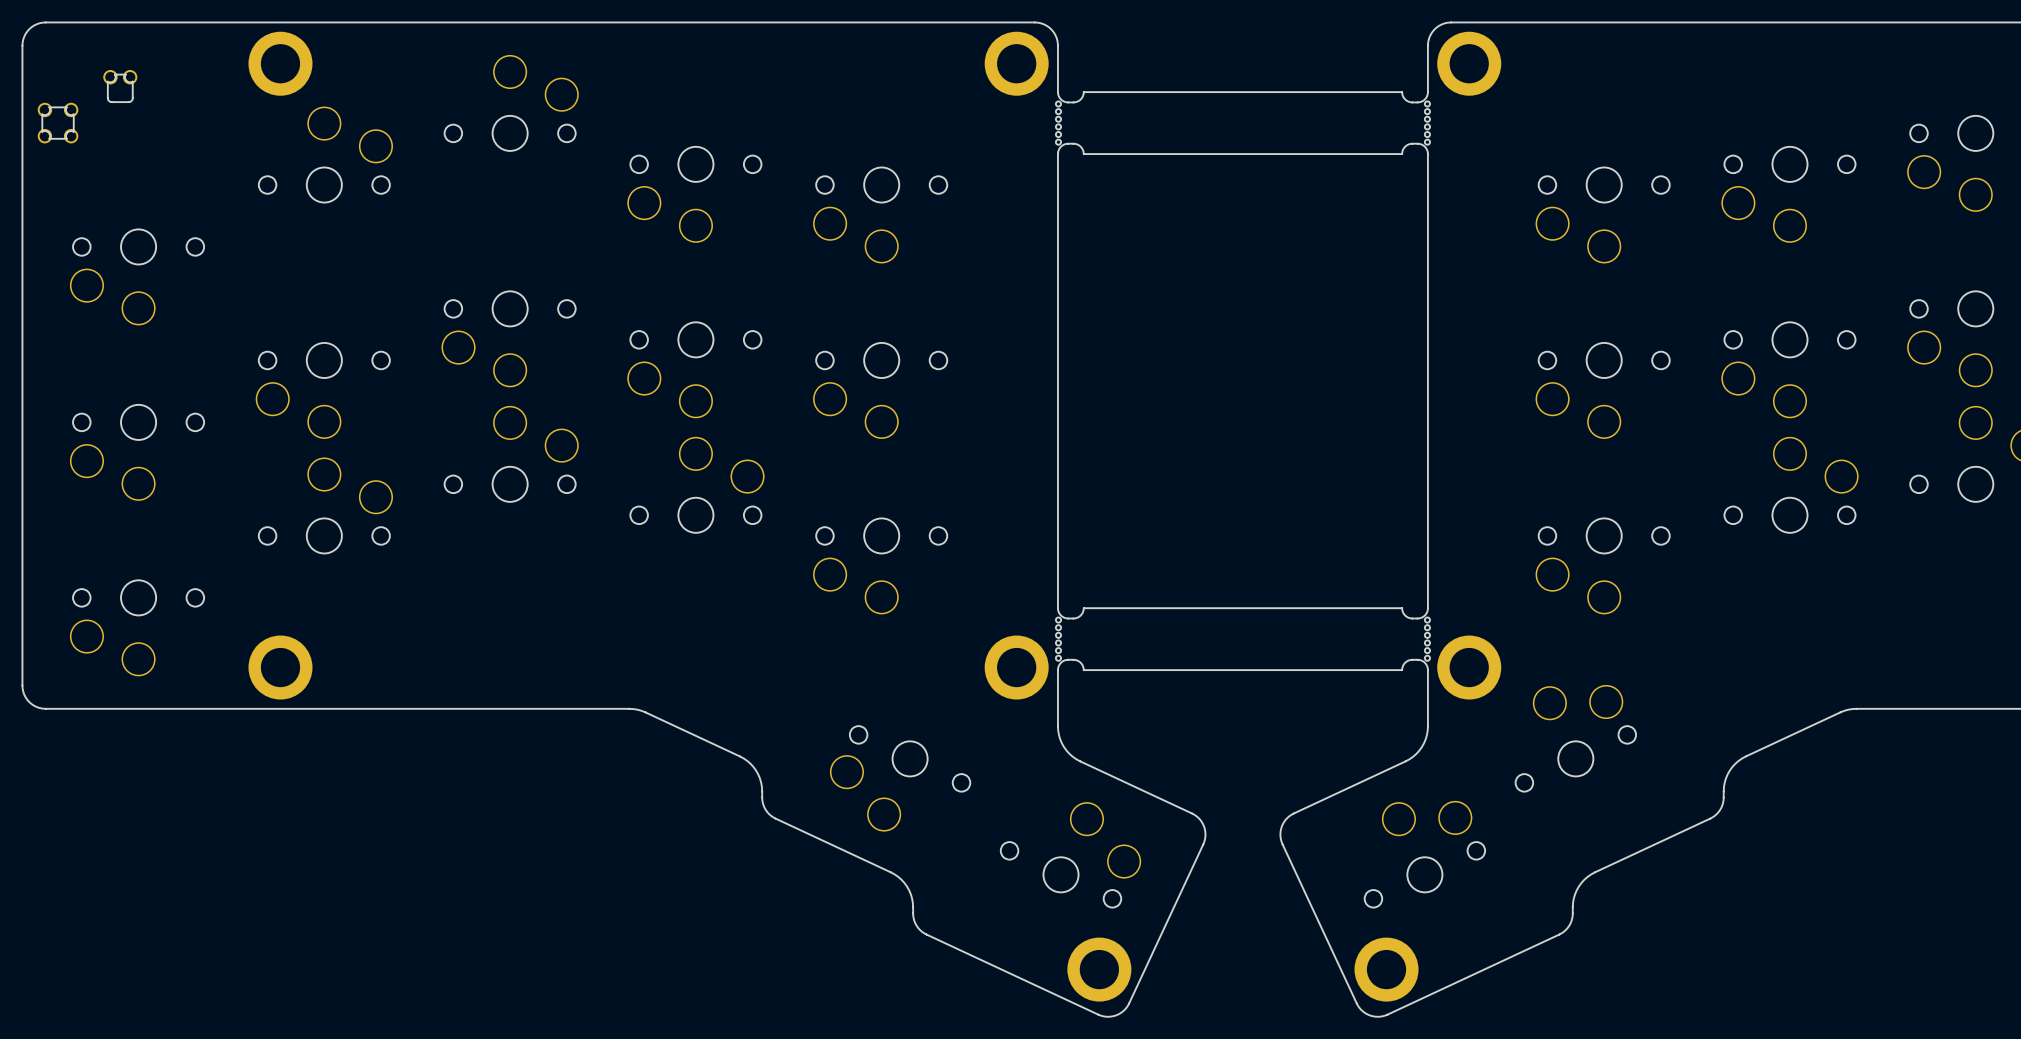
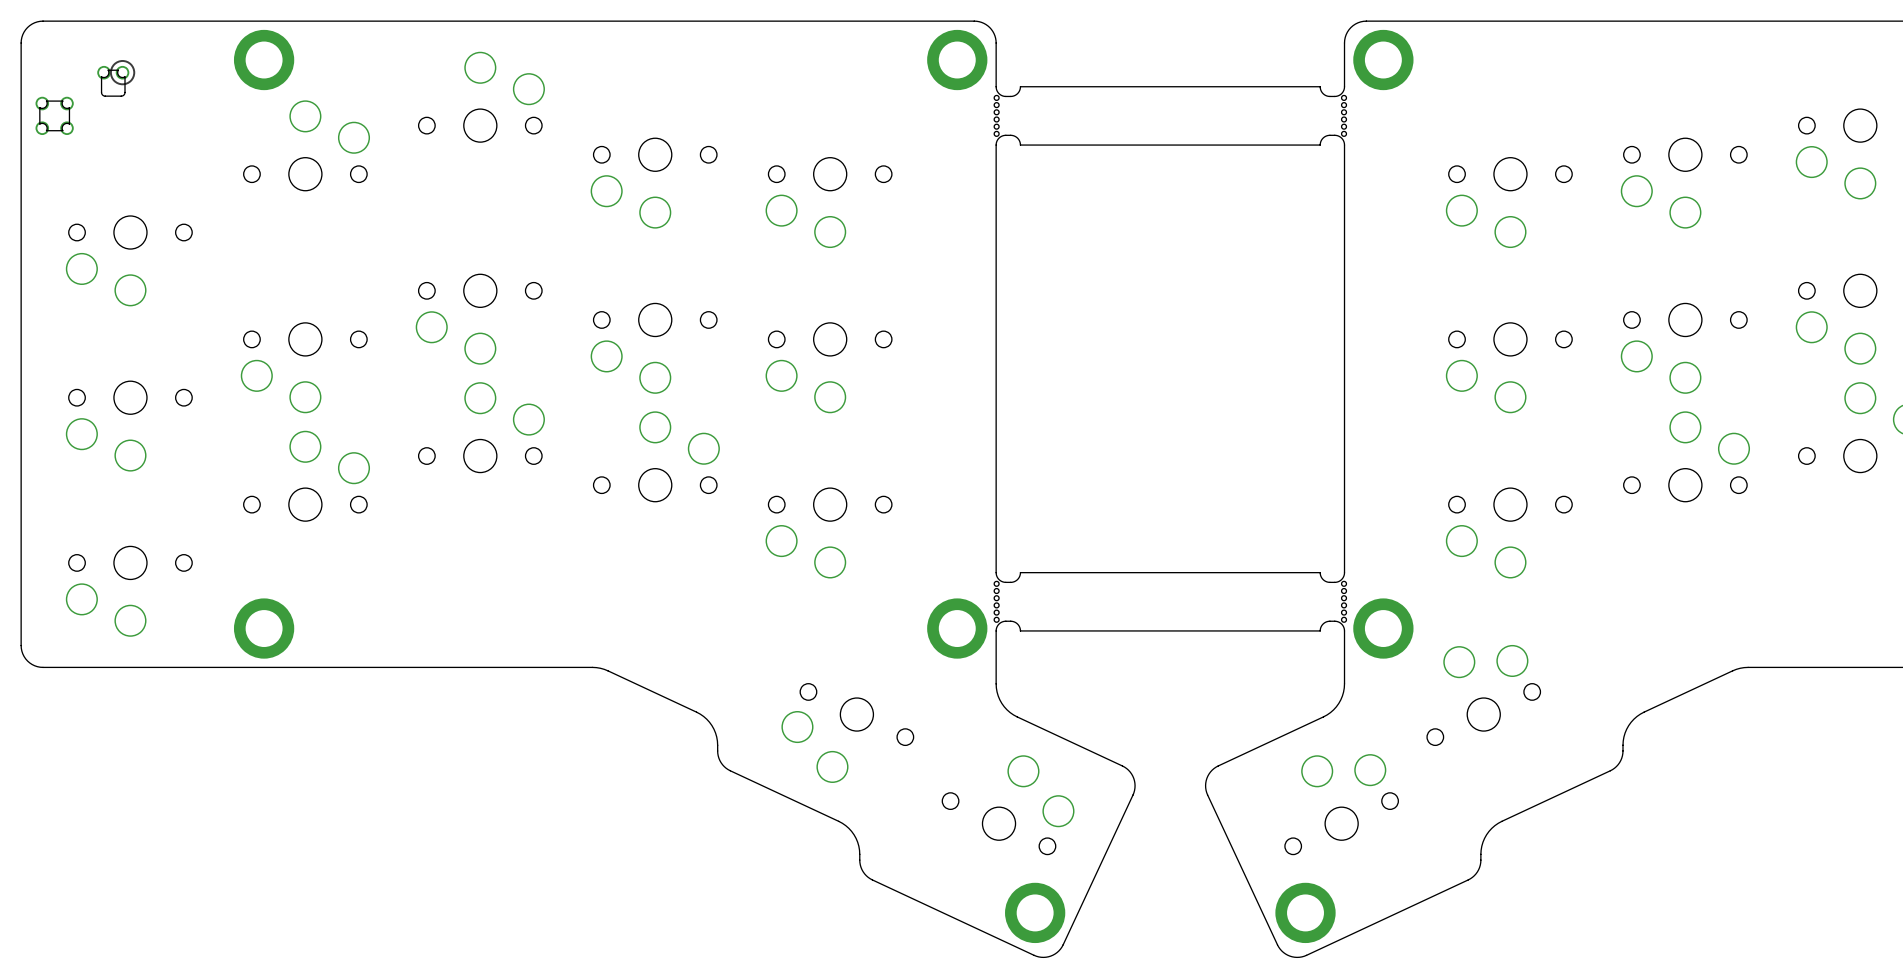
drawing: none -> [109, 60, 136, 86]

